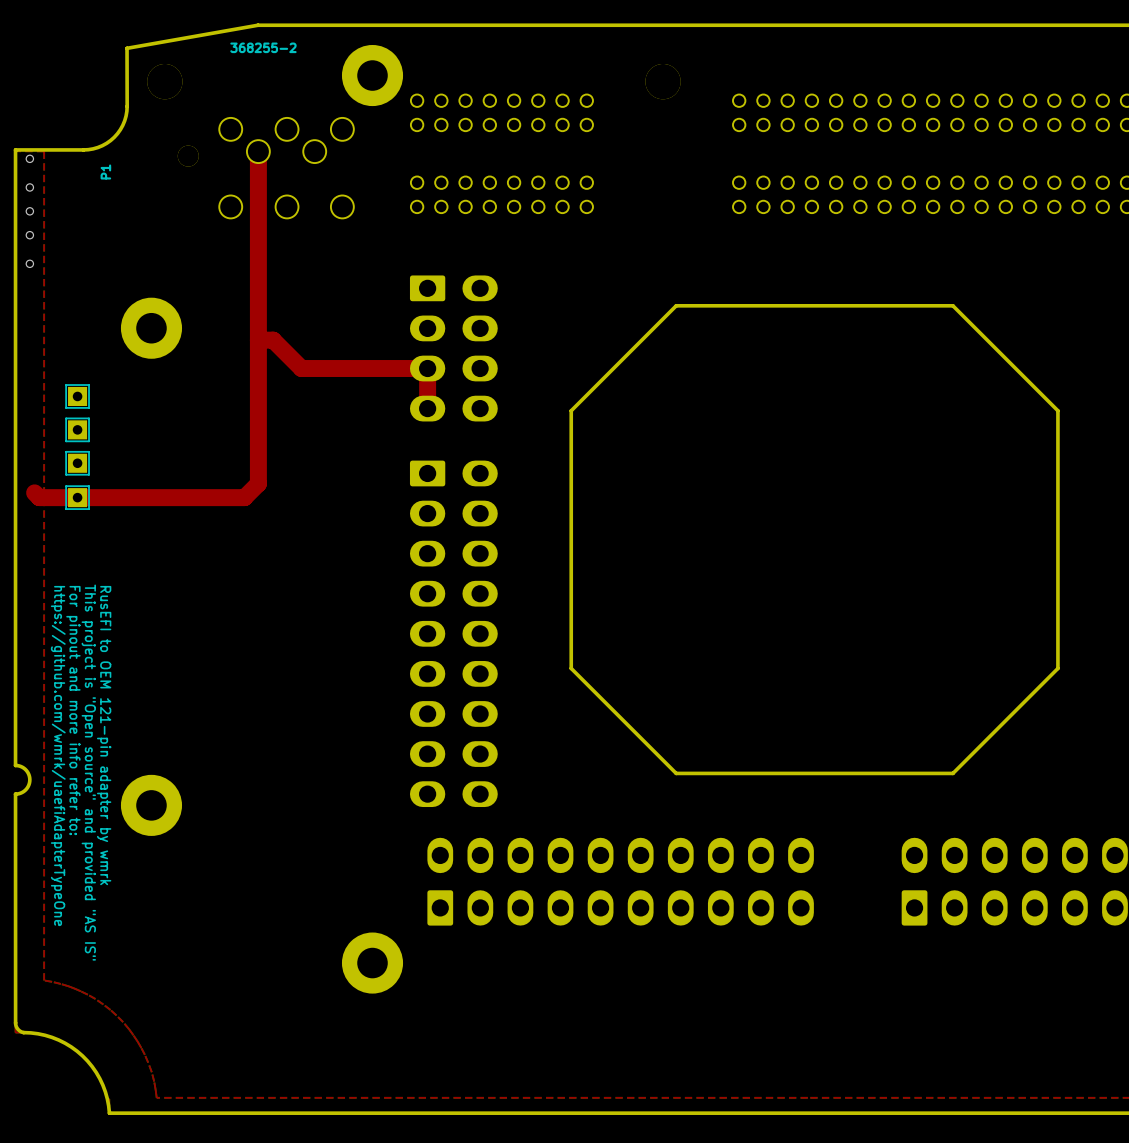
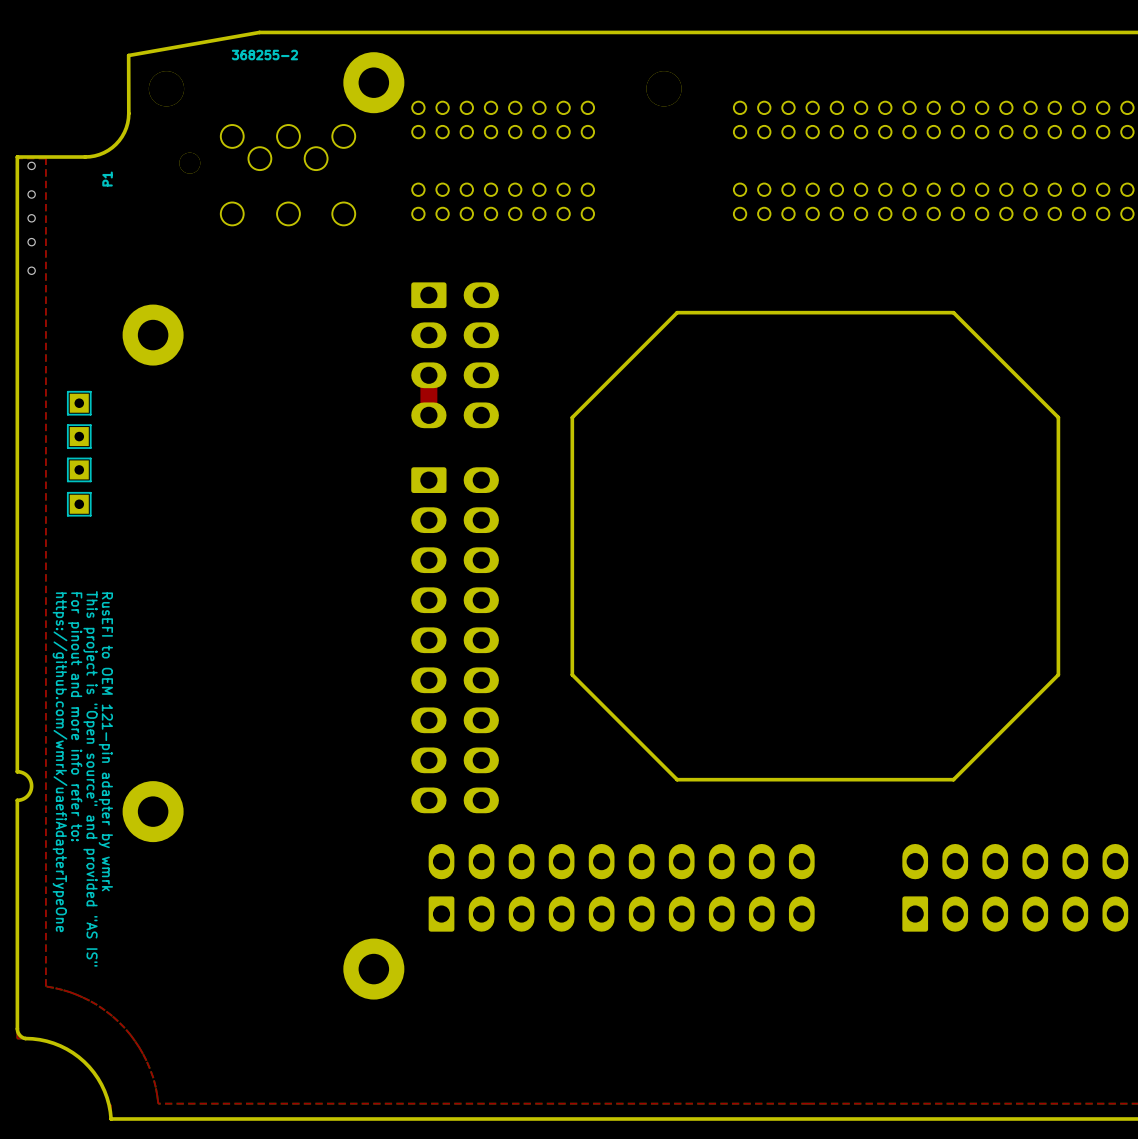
top track: (258, 151) (258, 483) (244, 497) (39, 497) (34, 492) -> none
top track: (258, 340) (273, 340) (301, 368) (427, 368) -> none

